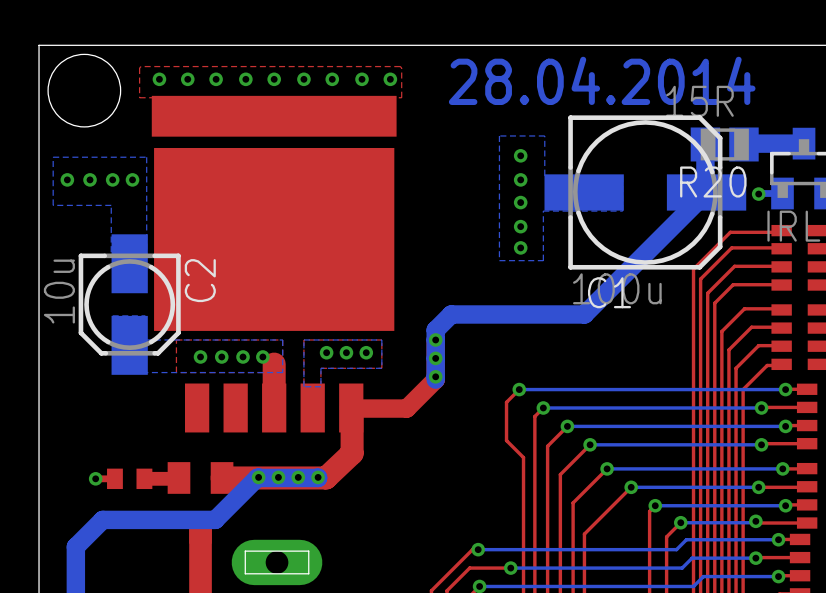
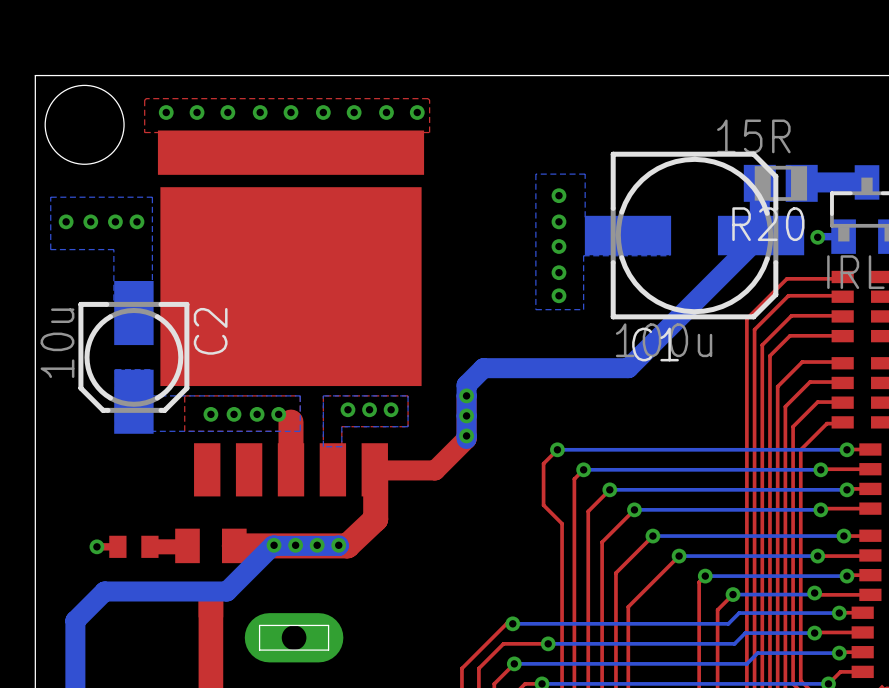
text: 28.04.2014 (602, 80) -> none

